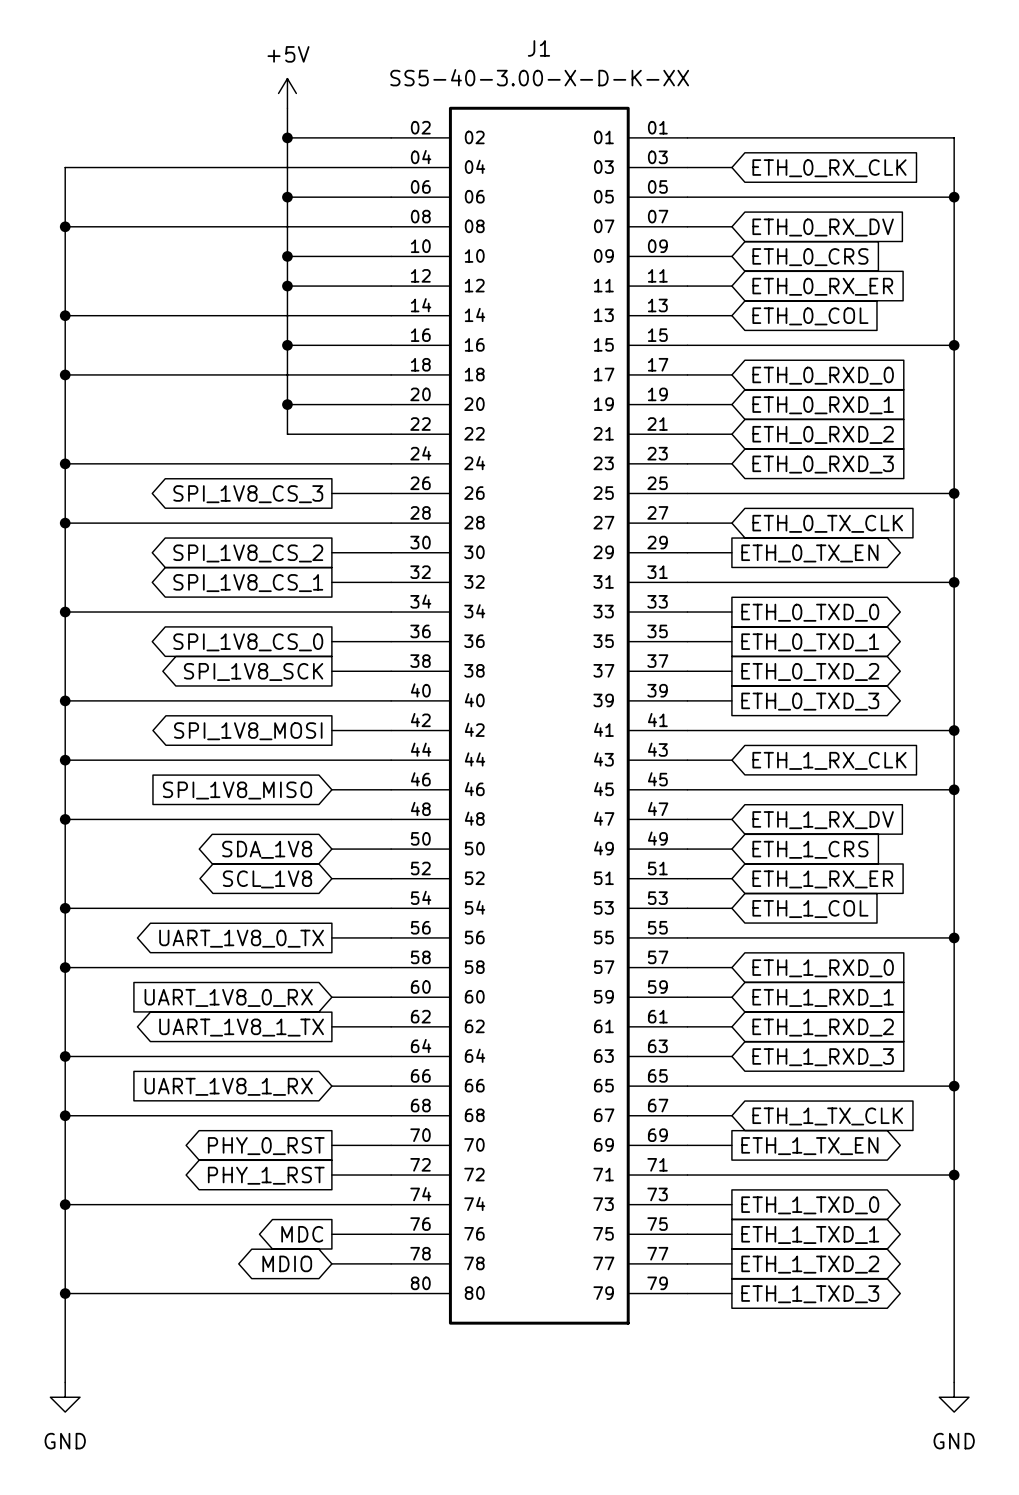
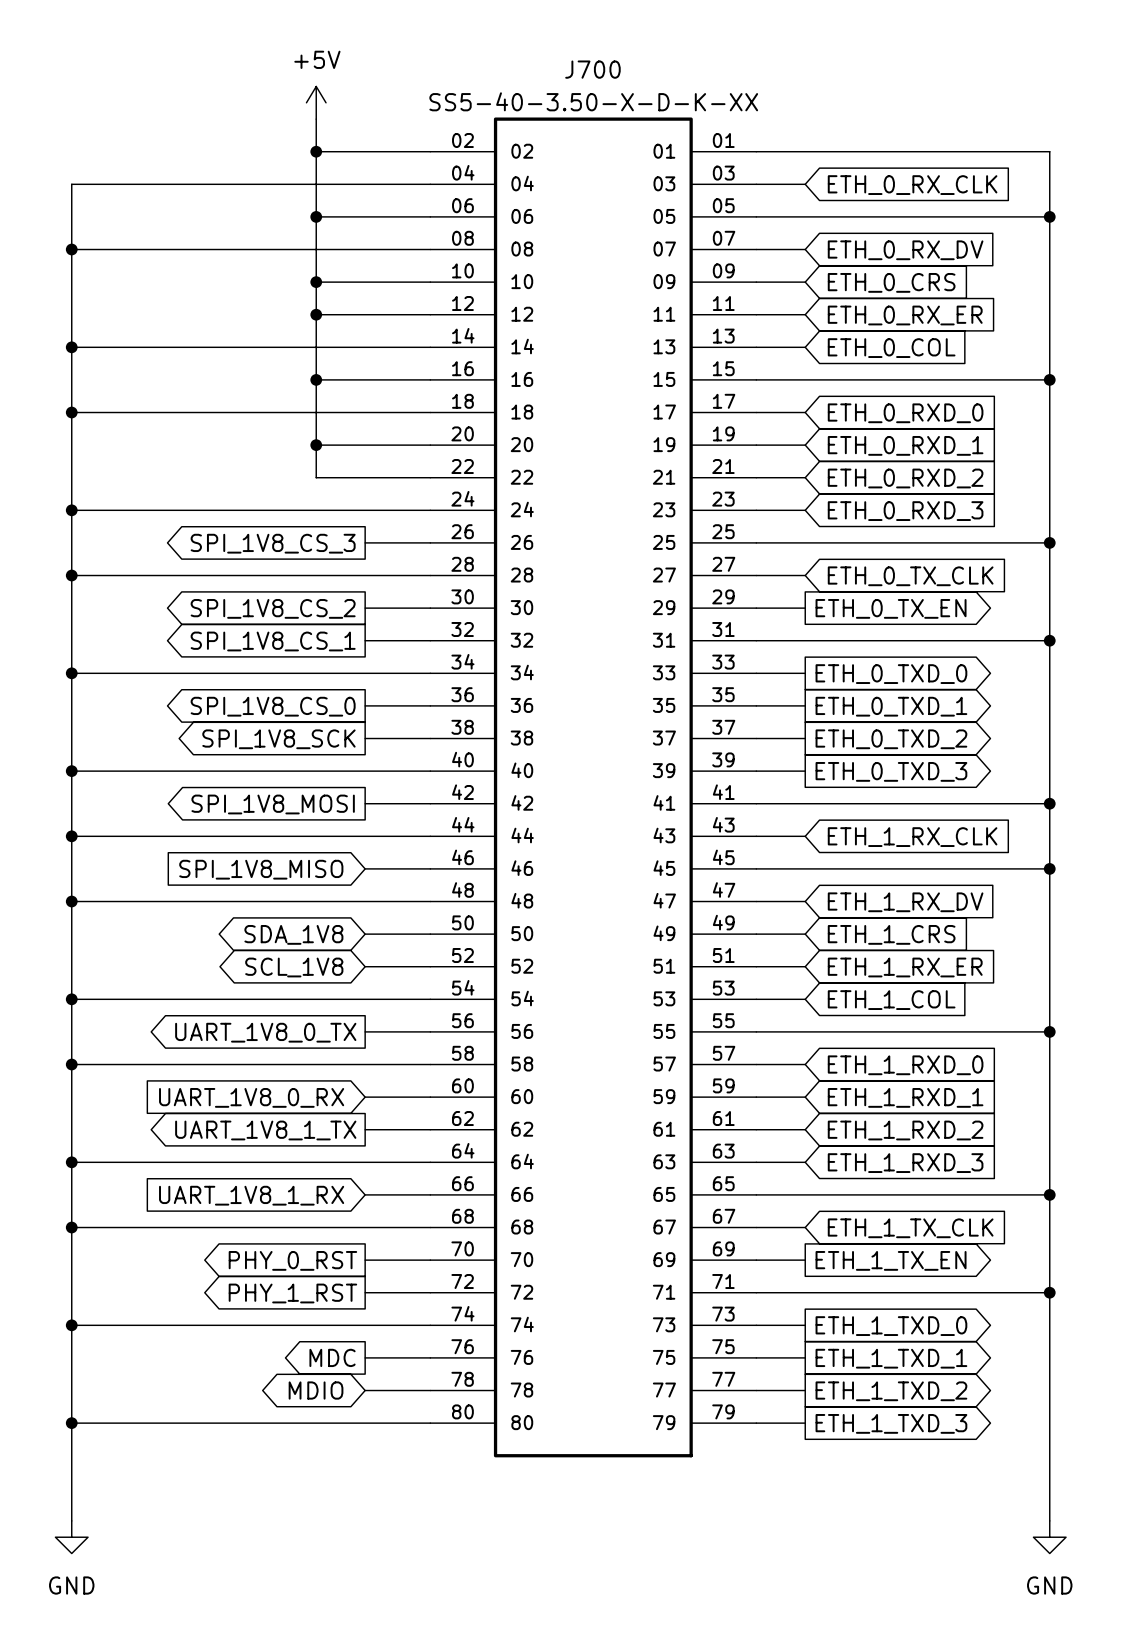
J1 name: J1 (538, 48) -> J700 (592, 69)
J1 value: SS5-40-3.00-X-D-K-XX (539, 77) -> SS5-40-3.50-X-D-K-XX (593, 101)

